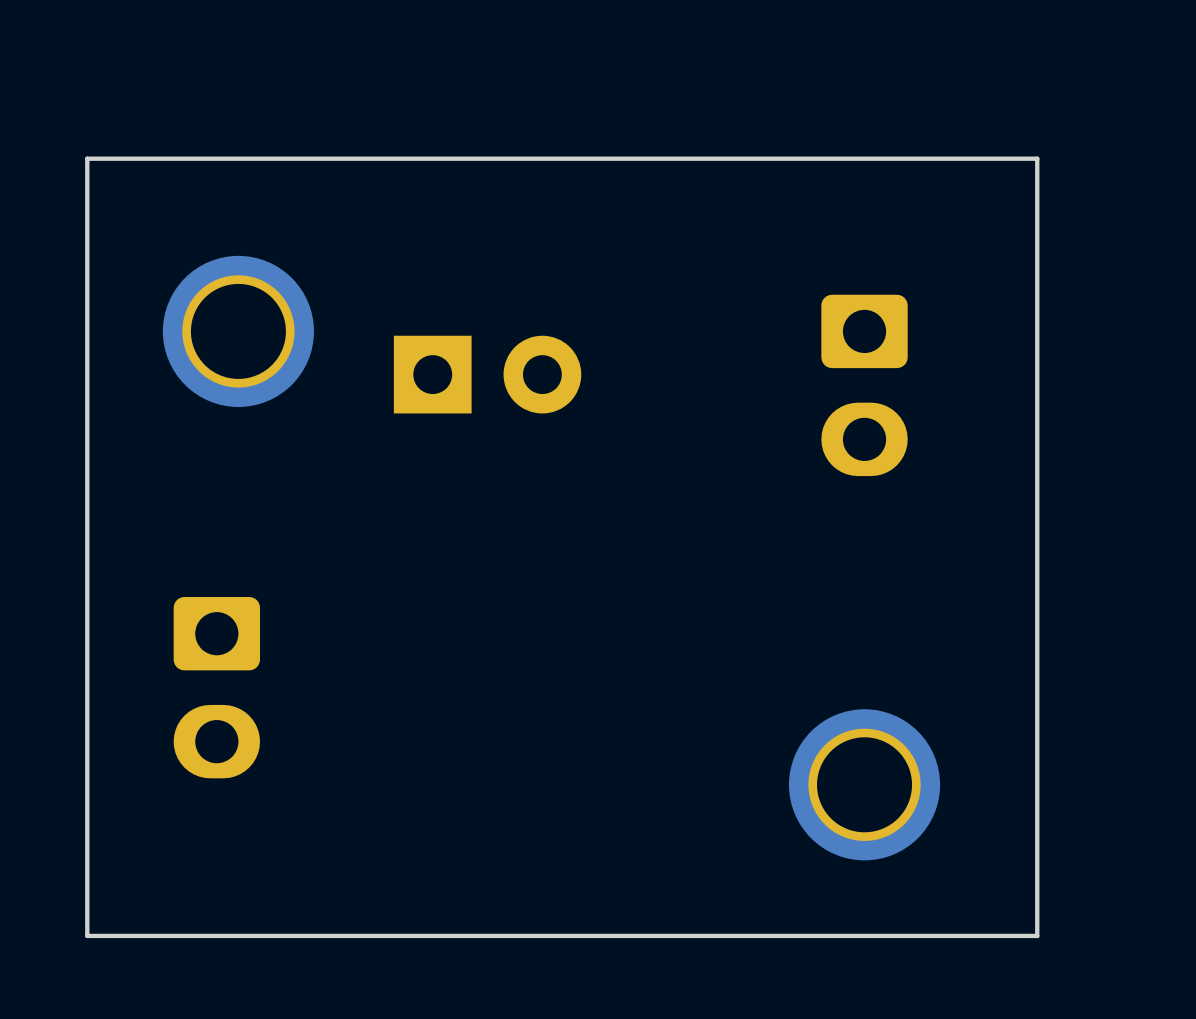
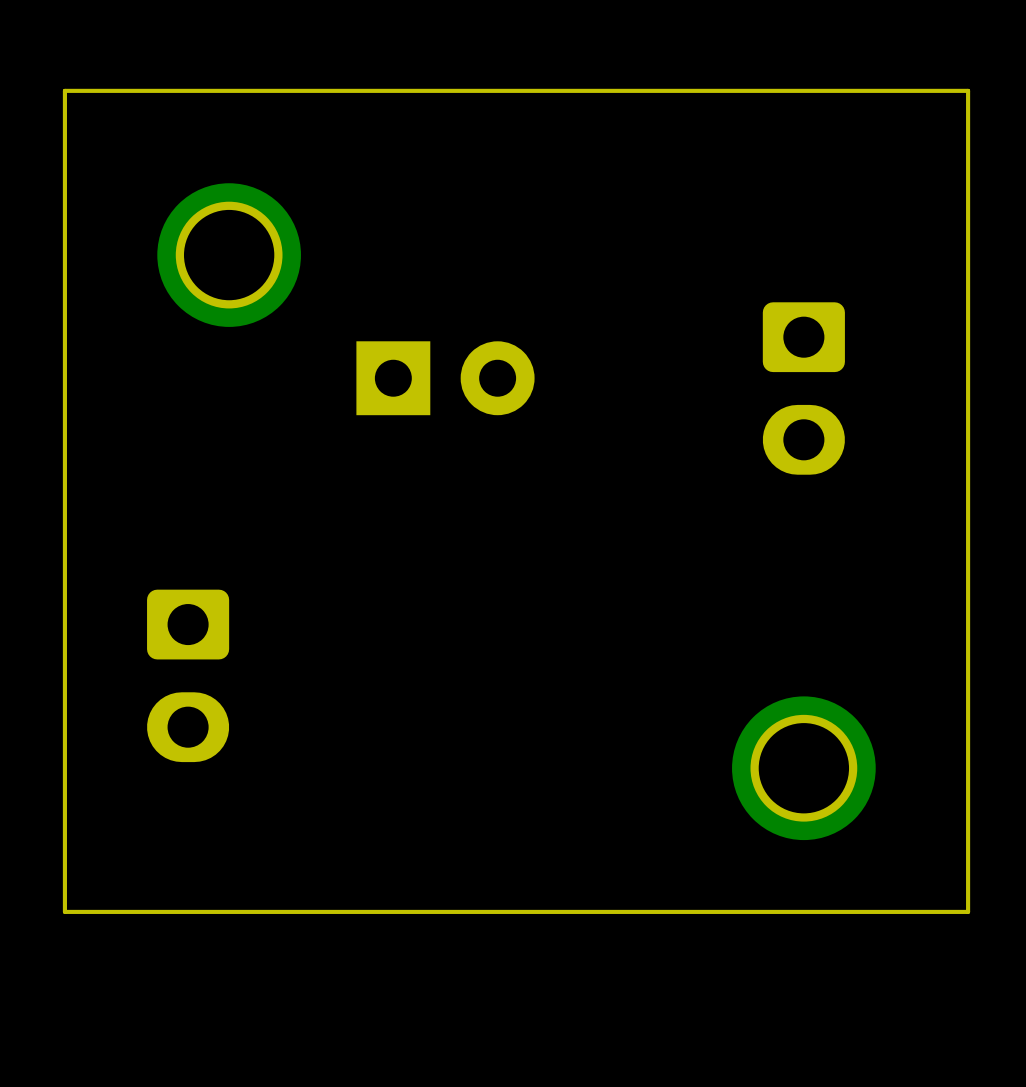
board edge: (1037, 158) (87, 158) -> (968, 172) (968, 90) (64, 90) (64, 172)
part position: (238, 331) -> (229, 255)

